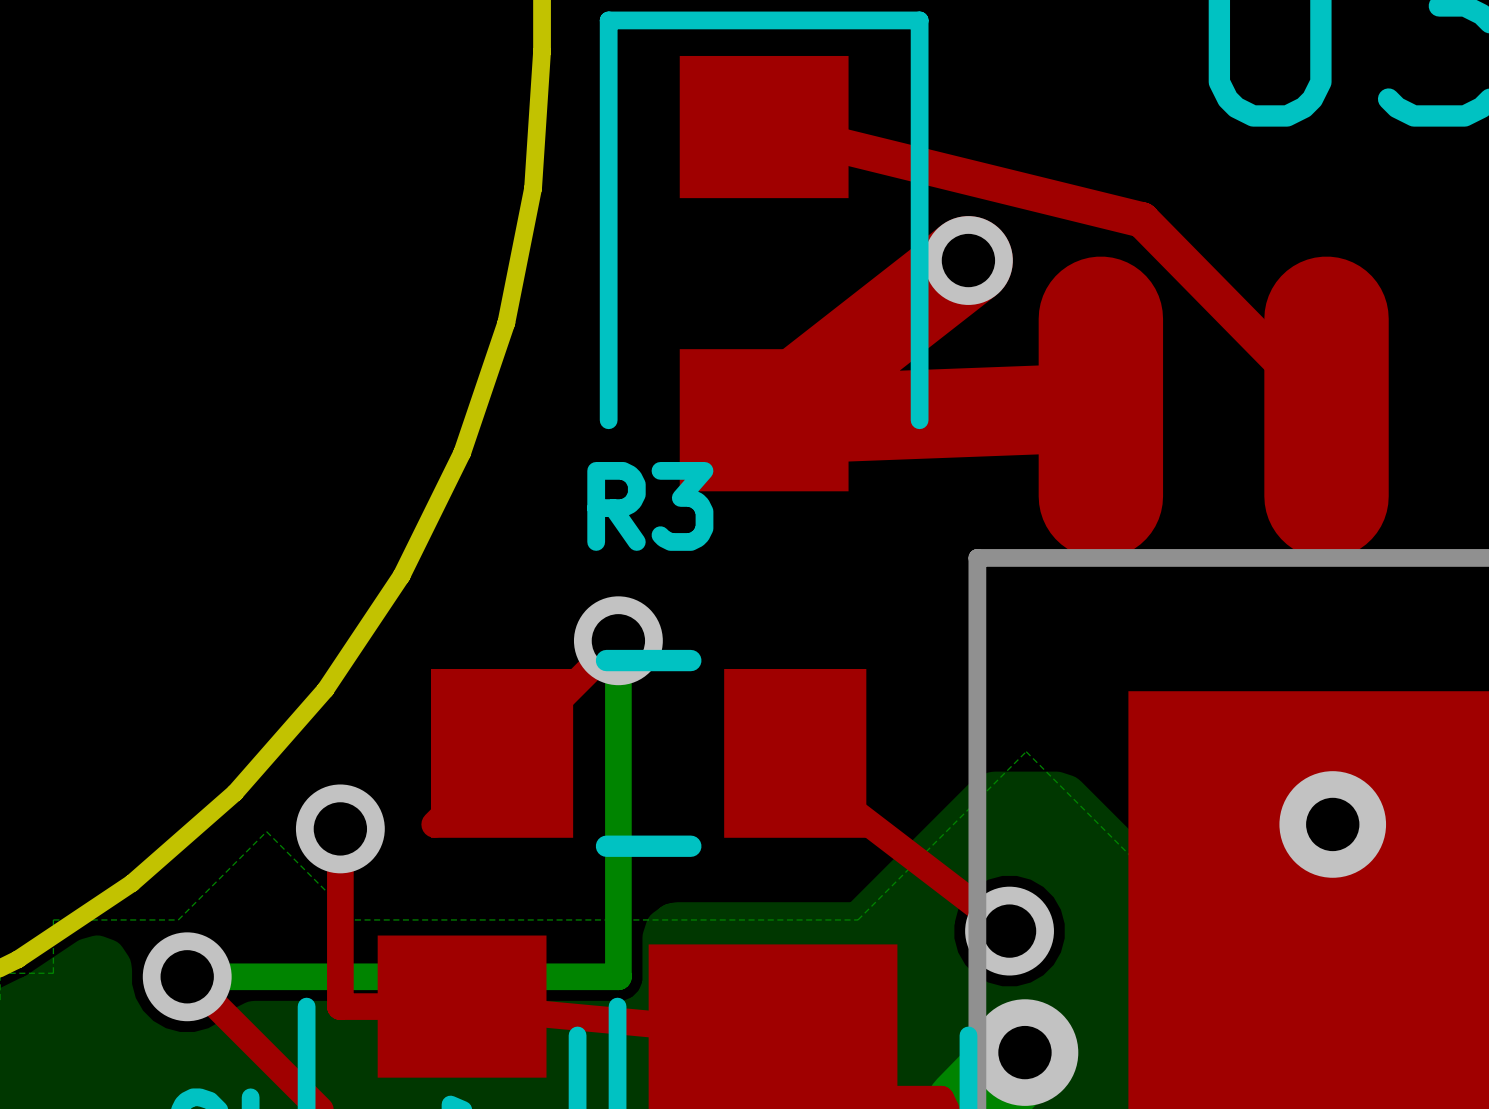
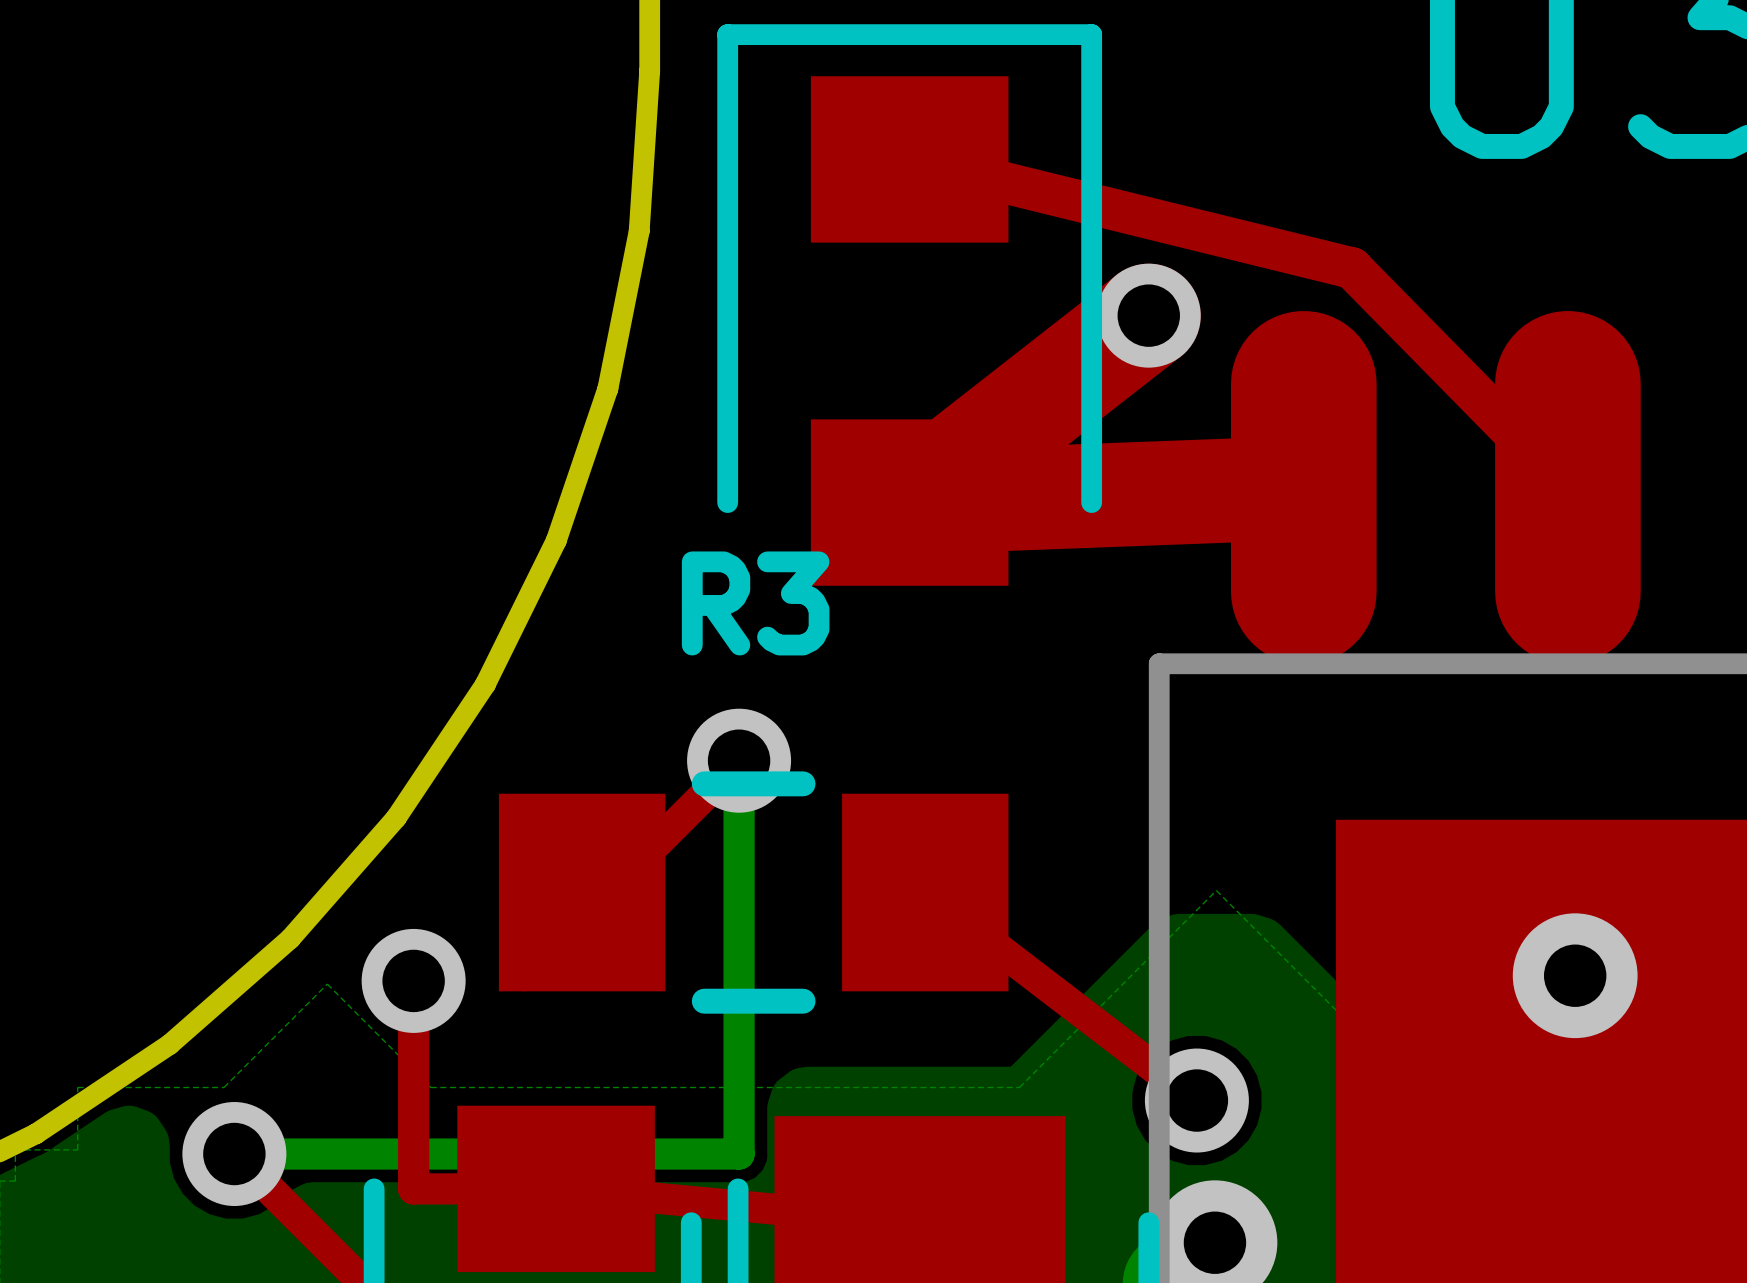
R3 position: (648, 753) -> (753, 892)

